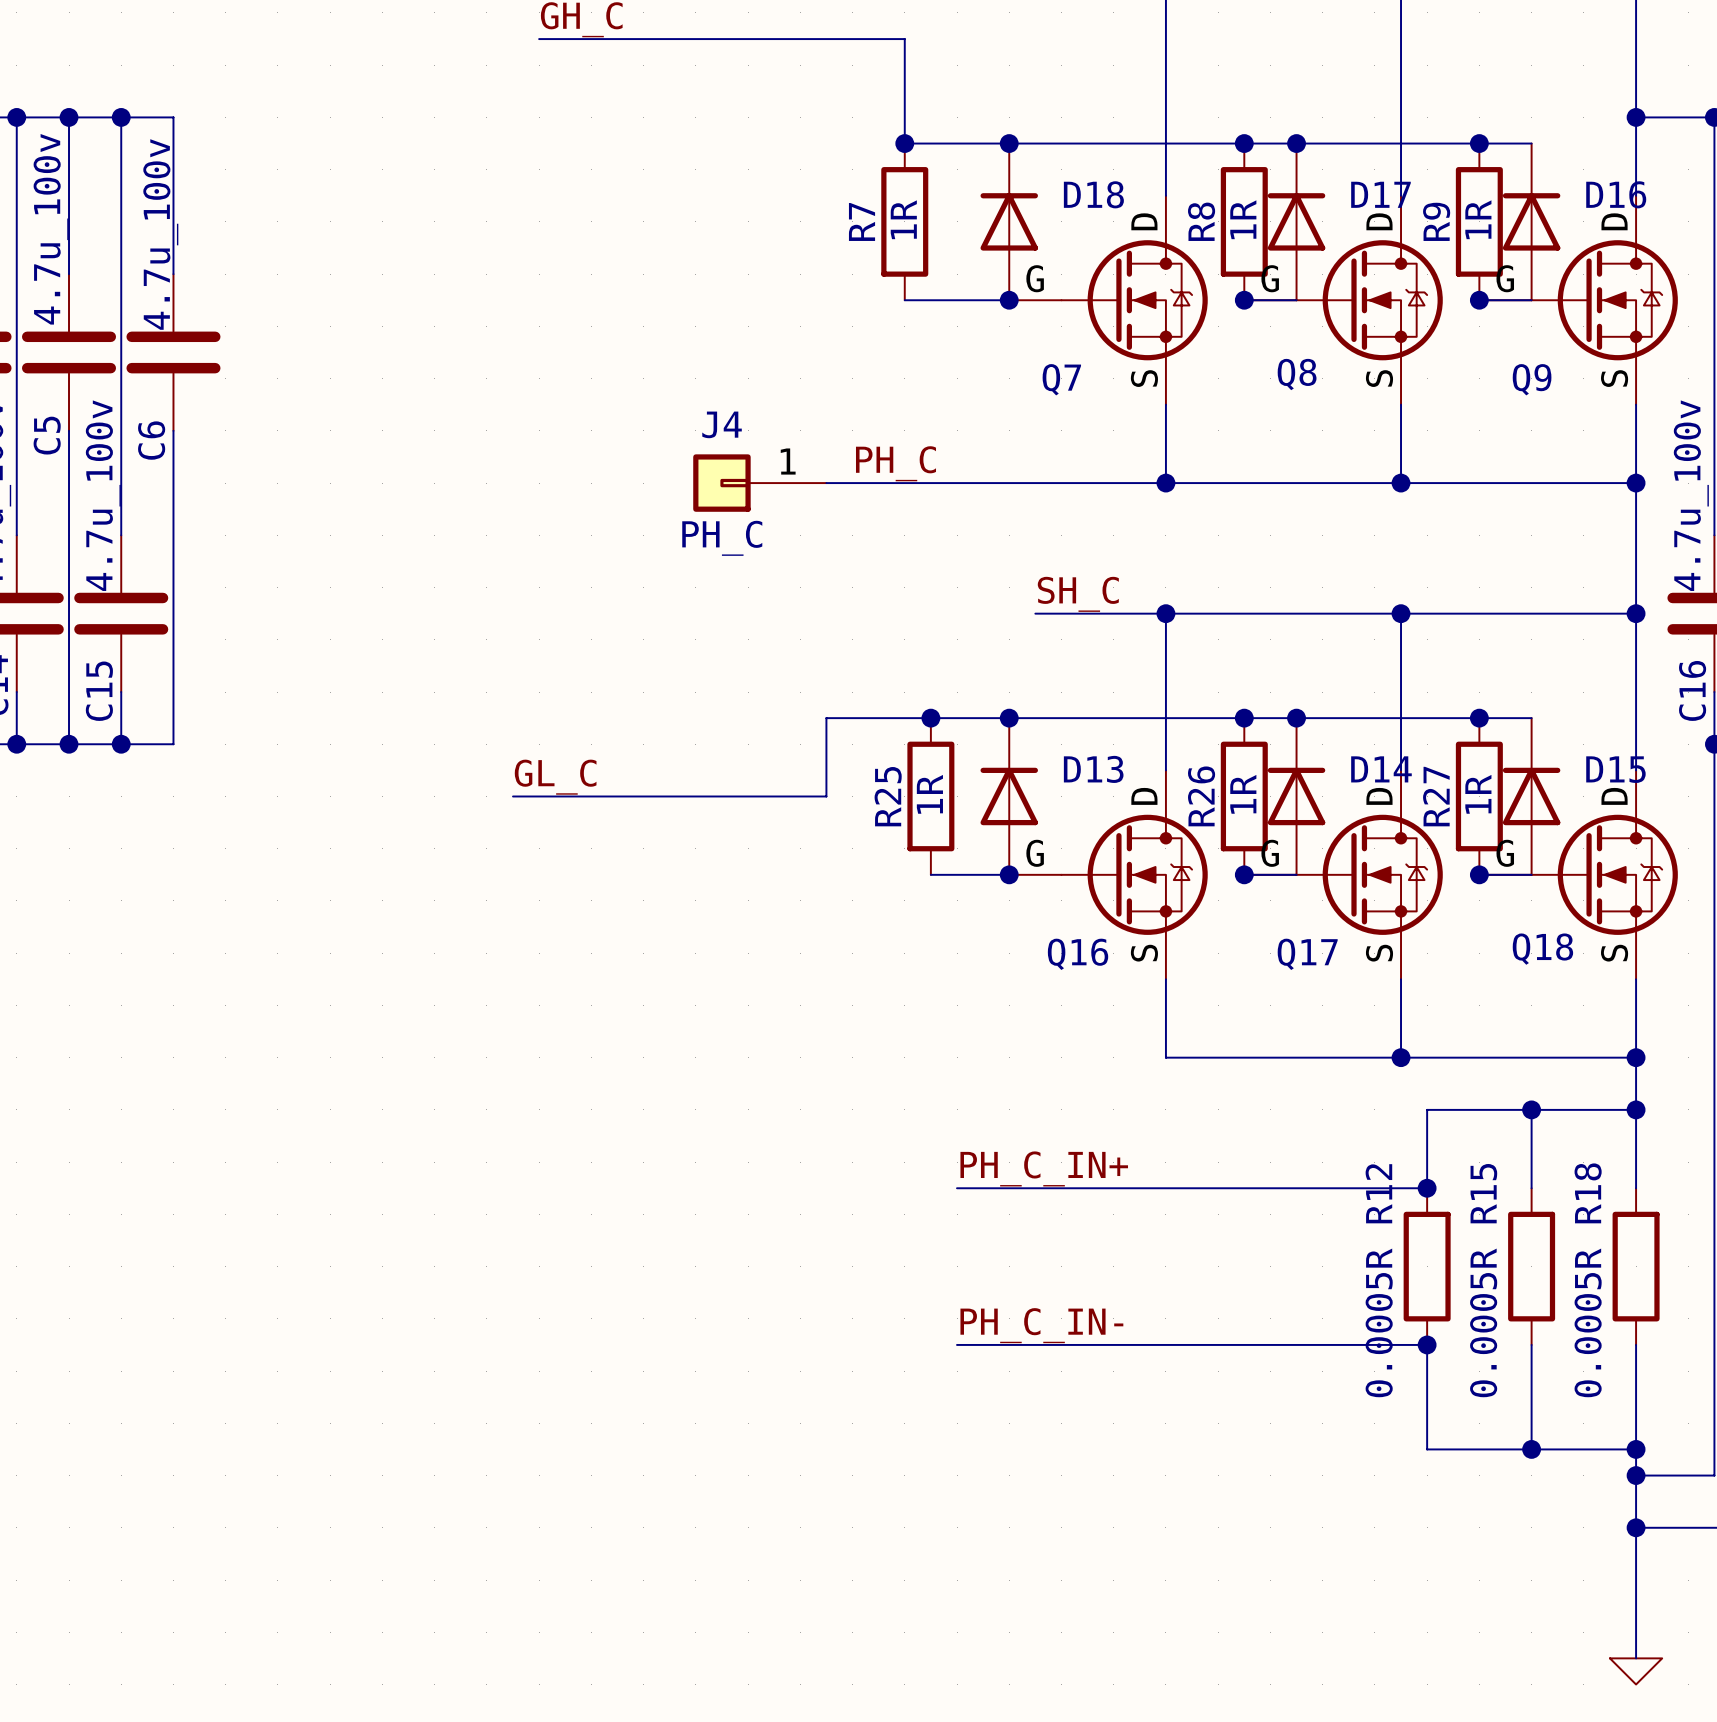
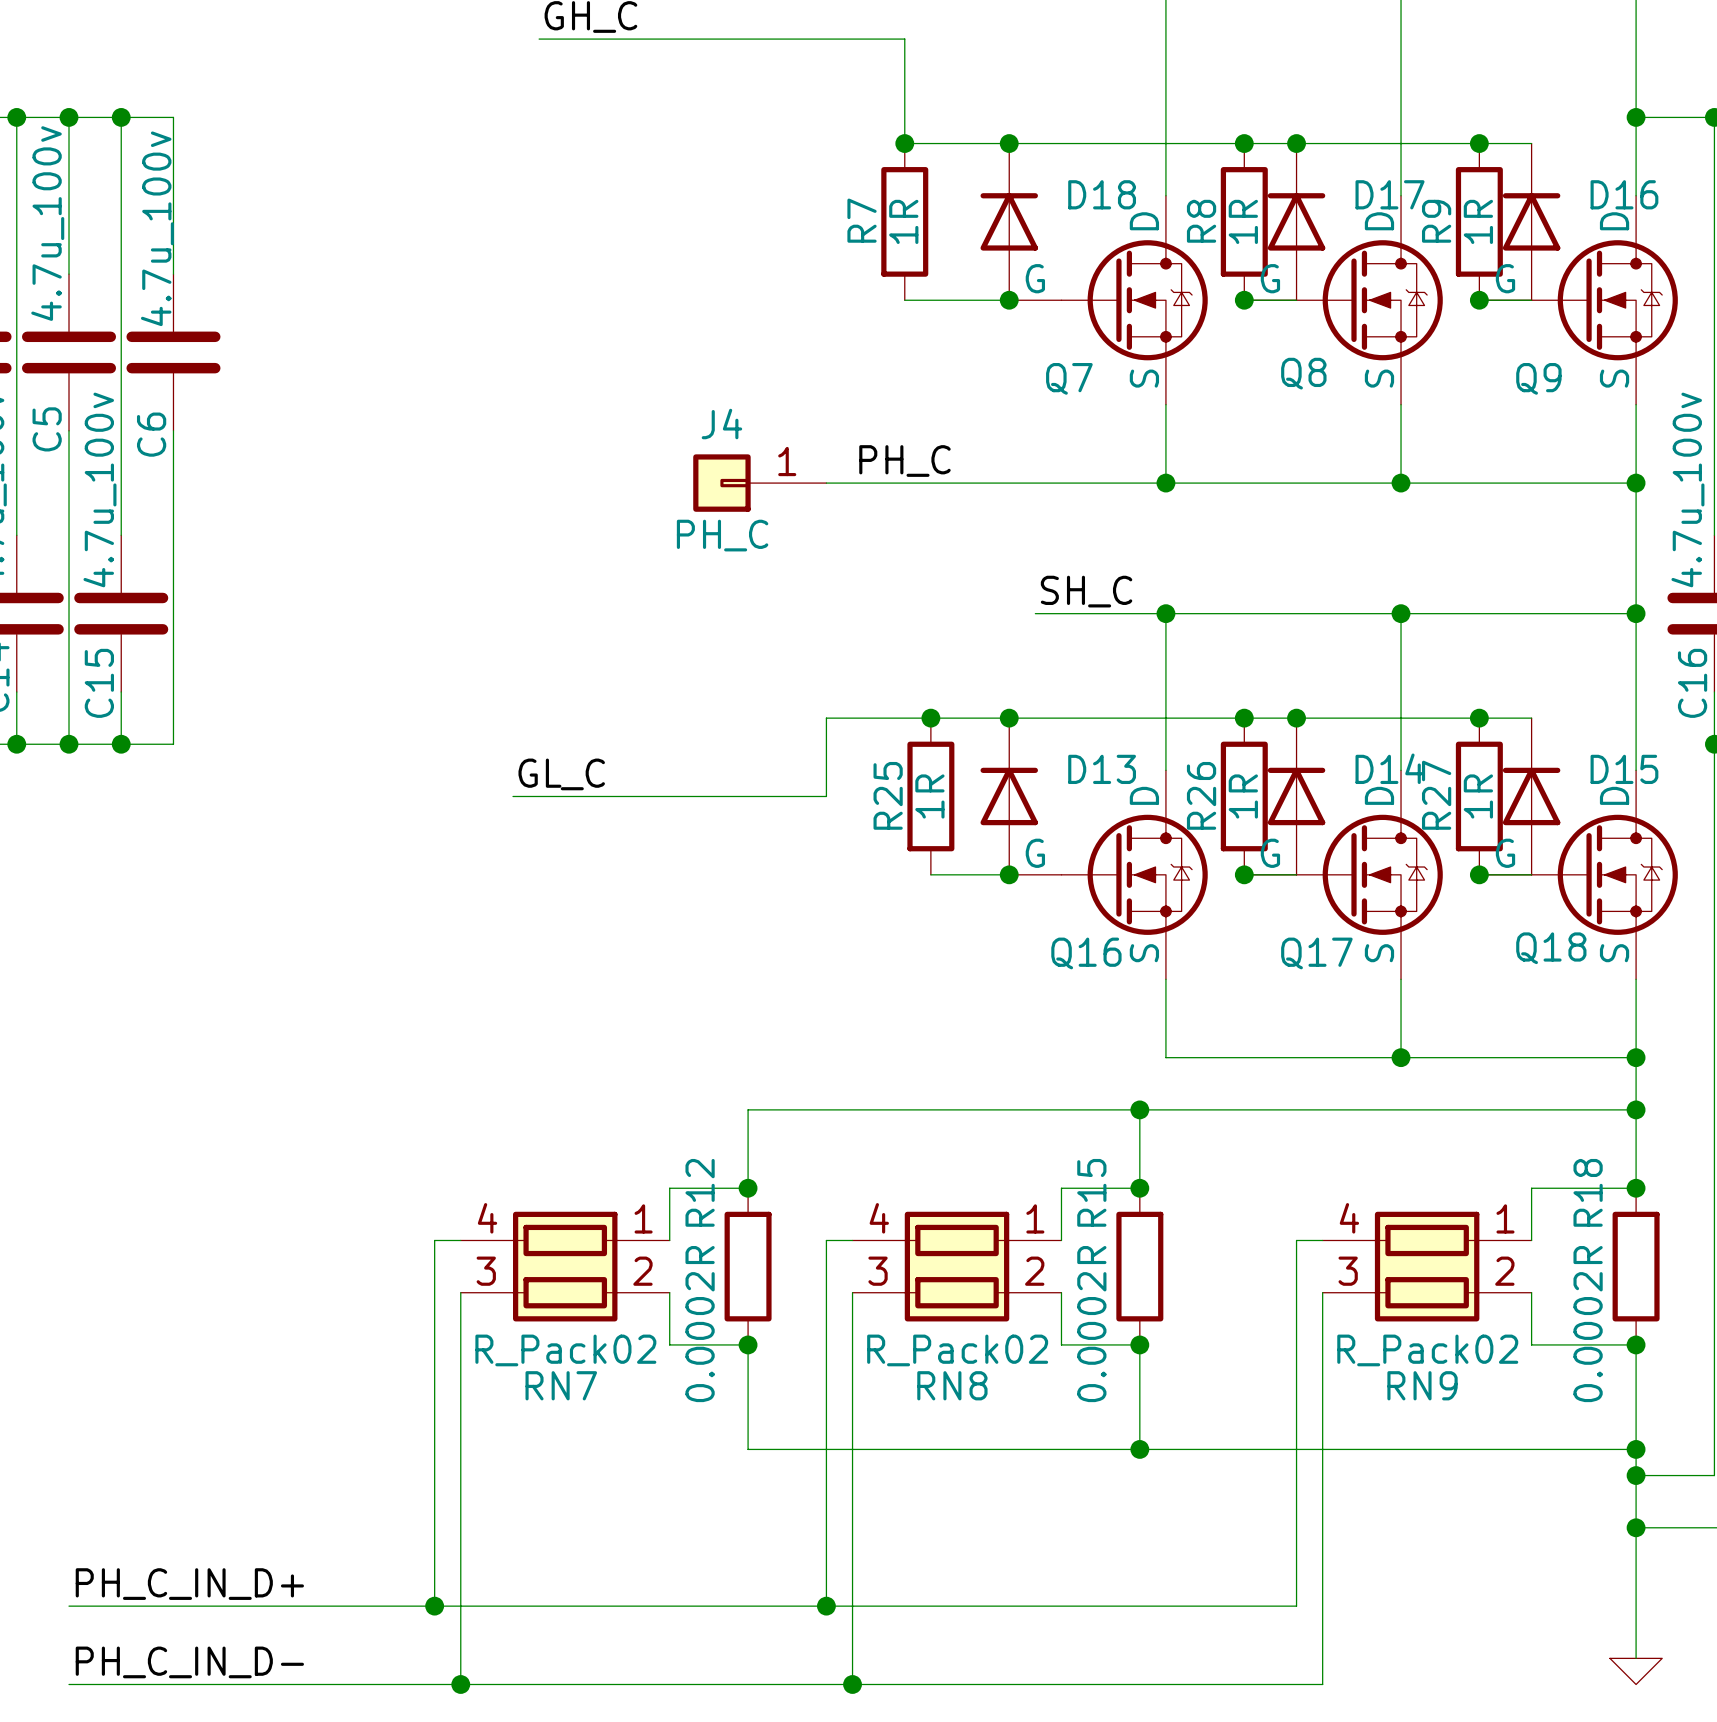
junction: none -> (1139, 1109)
wire: (1427, 1109) (1427, 1188) (1139, 1188) -> (1139, 1109) (1139, 1188)
wire: none -> (1427, 1109) (748, 1109) (748, 1188) (669, 1188) (669, 1240)
wire: (1531, 1109) (1531, 1188) -> none
junction: (1531, 1109) -> none
label: PH_C_IN+ (1044, 1168) -> none
junction: none -> (748, 1188)
wire: (957, 1188) (1061, 1188) -> (1061, 1240) (1061, 1188)
junction: none -> (1139, 1188)
junction: (1427, 1188) -> none
wire: none -> (1636, 1188) (1531, 1188) (1531, 1240)
junction: none -> (1636, 1188)
wire: none -> (460, 1240) (434, 1240) (434, 1606)
wire: none -> (852, 1240) (826, 1240) (826, 1606)
wire: none -> (1322, 1240) (1296, 1240) (1296, 1606) (69, 1606)
RN7: none -> R_Pack02 (565, 1266)
RN8: none -> R_Pack02 (957, 1266)
R12 position: (1427, 1266) -> (748, 1266)
RN9: none -> R_Pack02 (1427, 1266)
R15 position: (1531, 1266) -> (1139, 1266)
wire: none -> (460, 1292) (460, 1684)
wire: none -> (669, 1292) (669, 1344) (748, 1344) (748, 1449) (1427, 1449)
wire: none -> (852, 1292) (852, 1684)
wire: none -> (1322, 1292) (1322, 1684) (69, 1684)
wire: none -> (1531, 1292) (1531, 1344) (1636, 1344)
R12 value: 0.0005R (1379, 1322) -> 0.0002R (700, 1324)
R15 value: 0.0005R (1483, 1322) -> 0.0002R (1091, 1324)
R18 value: 0.0005R (1588, 1322) -> 0.0002R (1588, 1324)
label: PH_C_IN- (1041, 1325) -> none
junction: none -> (748, 1344)
wire: (957, 1344) (1061, 1344) -> (1061, 1292) (1061, 1344)
wire: (1139, 1344) (1427, 1344) (1427, 1449) -> (1139, 1344) (1139, 1449)
junction: none -> (1139, 1344)
junction: (1427, 1344) -> none
wire: (1531, 1344) (1531, 1449) -> none
junction: none -> (1636, 1344)
junction: none -> (1139, 1449)
junction: (1531, 1449) -> none
label: none -> PH_C_IN_D+ (189, 1584)
junction: none -> (434, 1606)
junction: none -> (826, 1606)
label: none -> PH_C_IN_D- (189, 1662)
junction: none -> (460, 1684)
junction: none -> (852, 1684)

